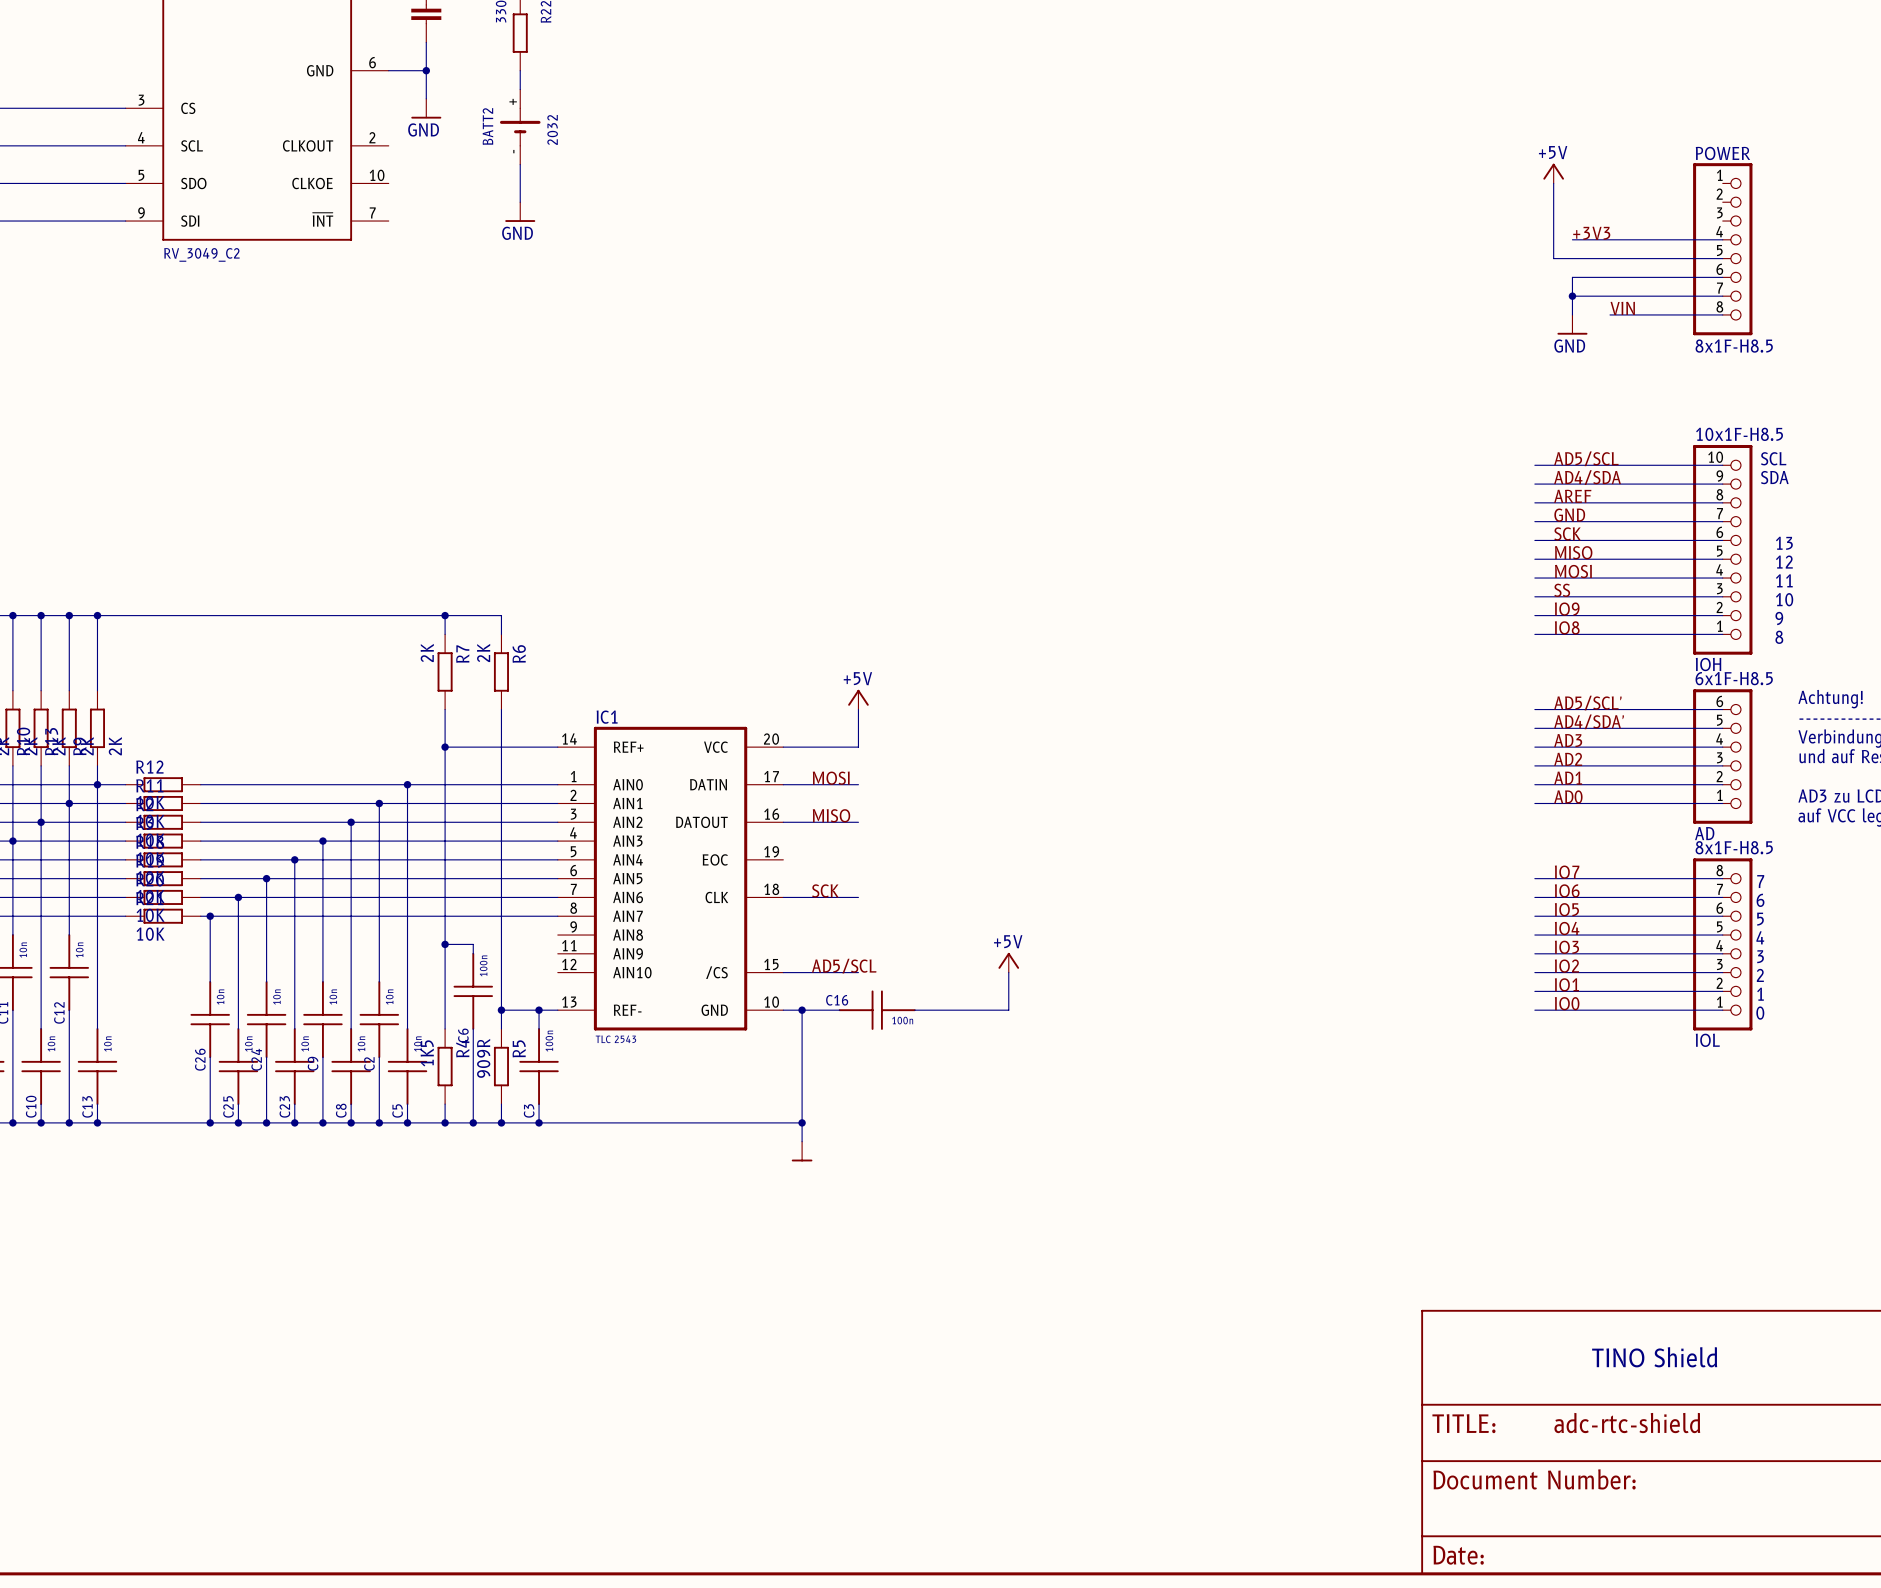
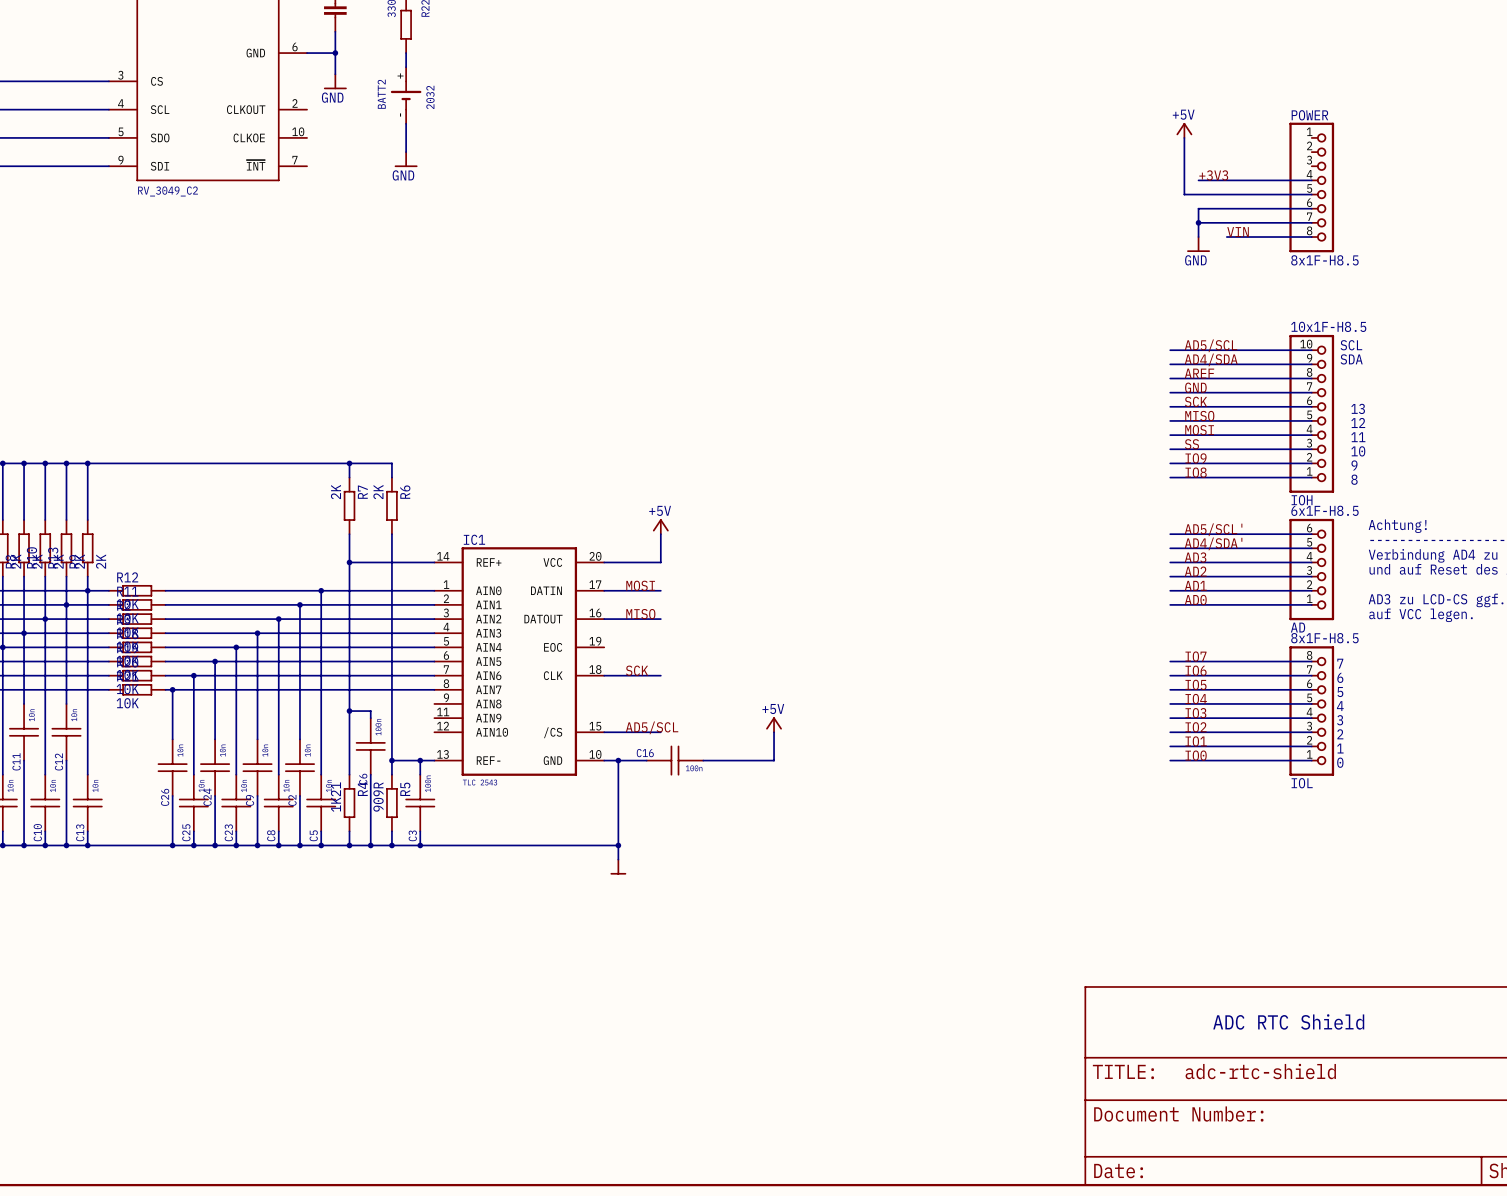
R4 value: 1K5 (427, 1053) -> 1K21 (335, 797)
text: TINO Shield (1654, 1357) -> ADC RTC Shield (1288, 1021)

